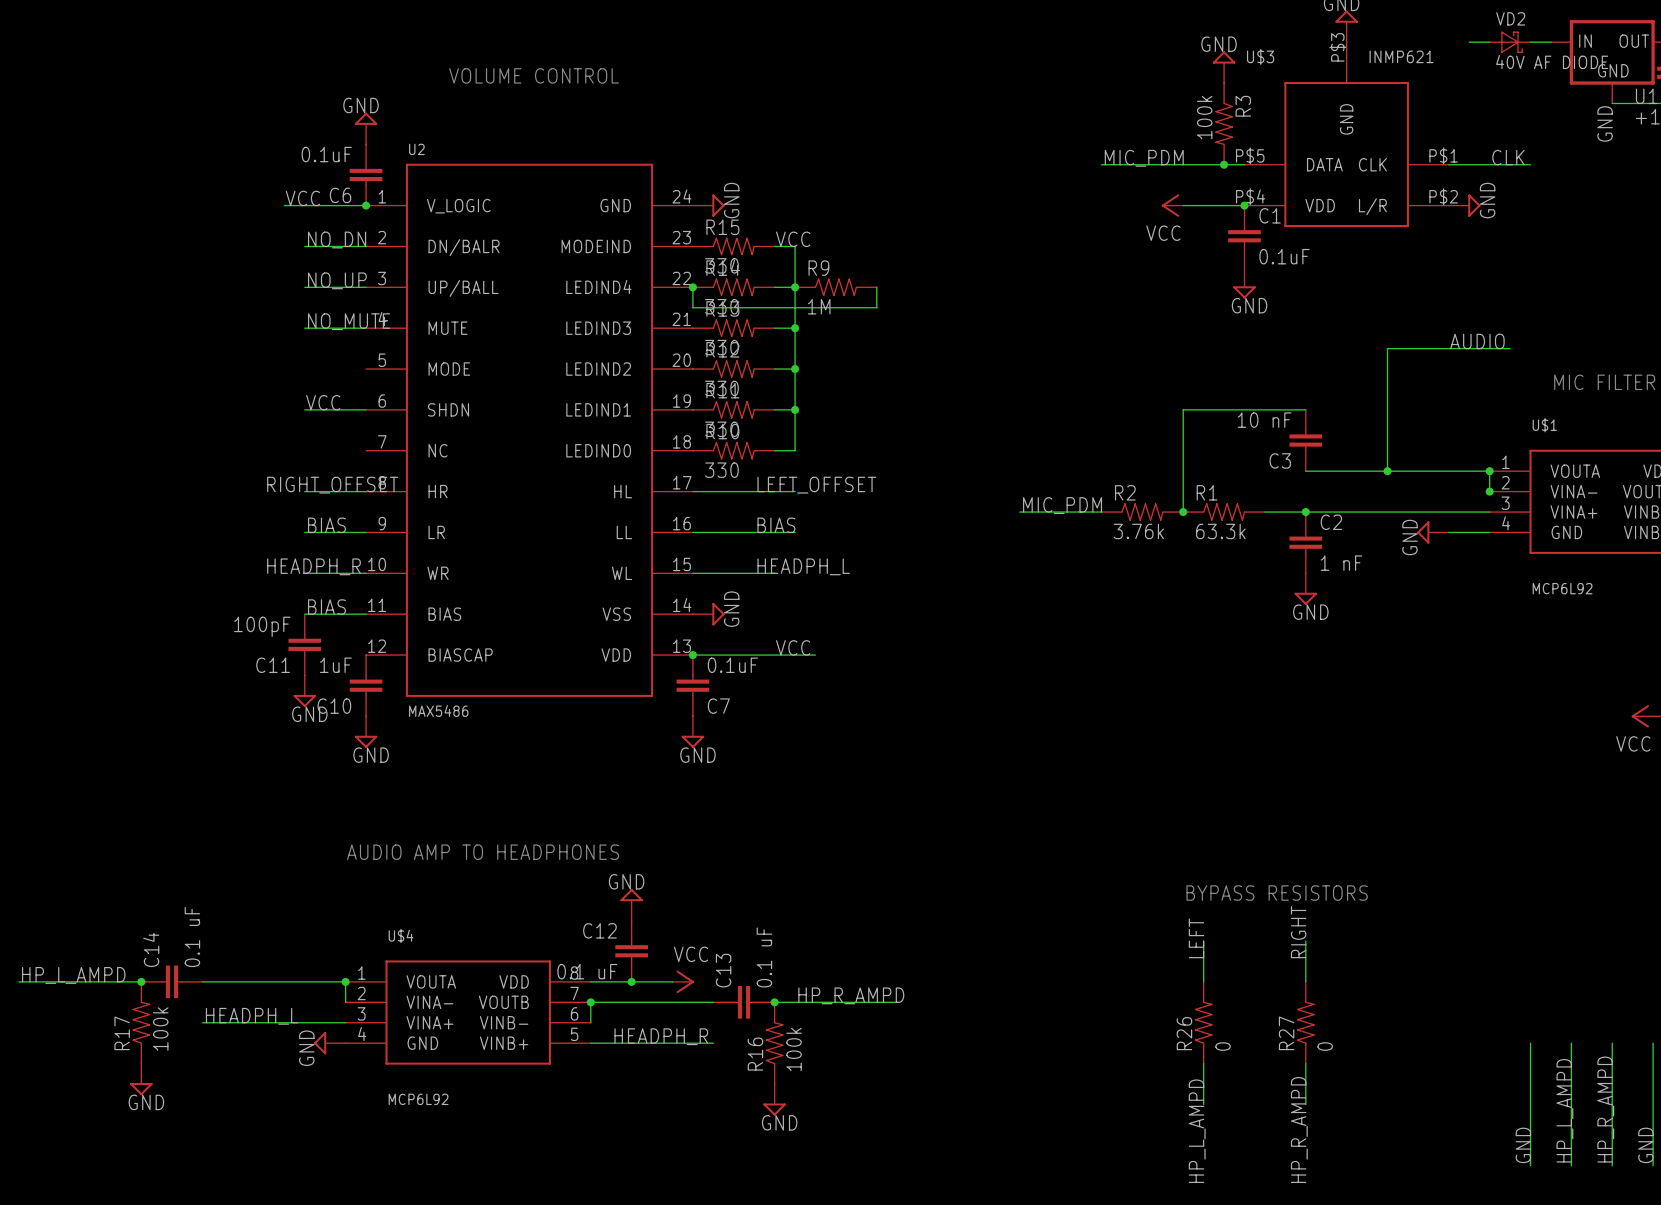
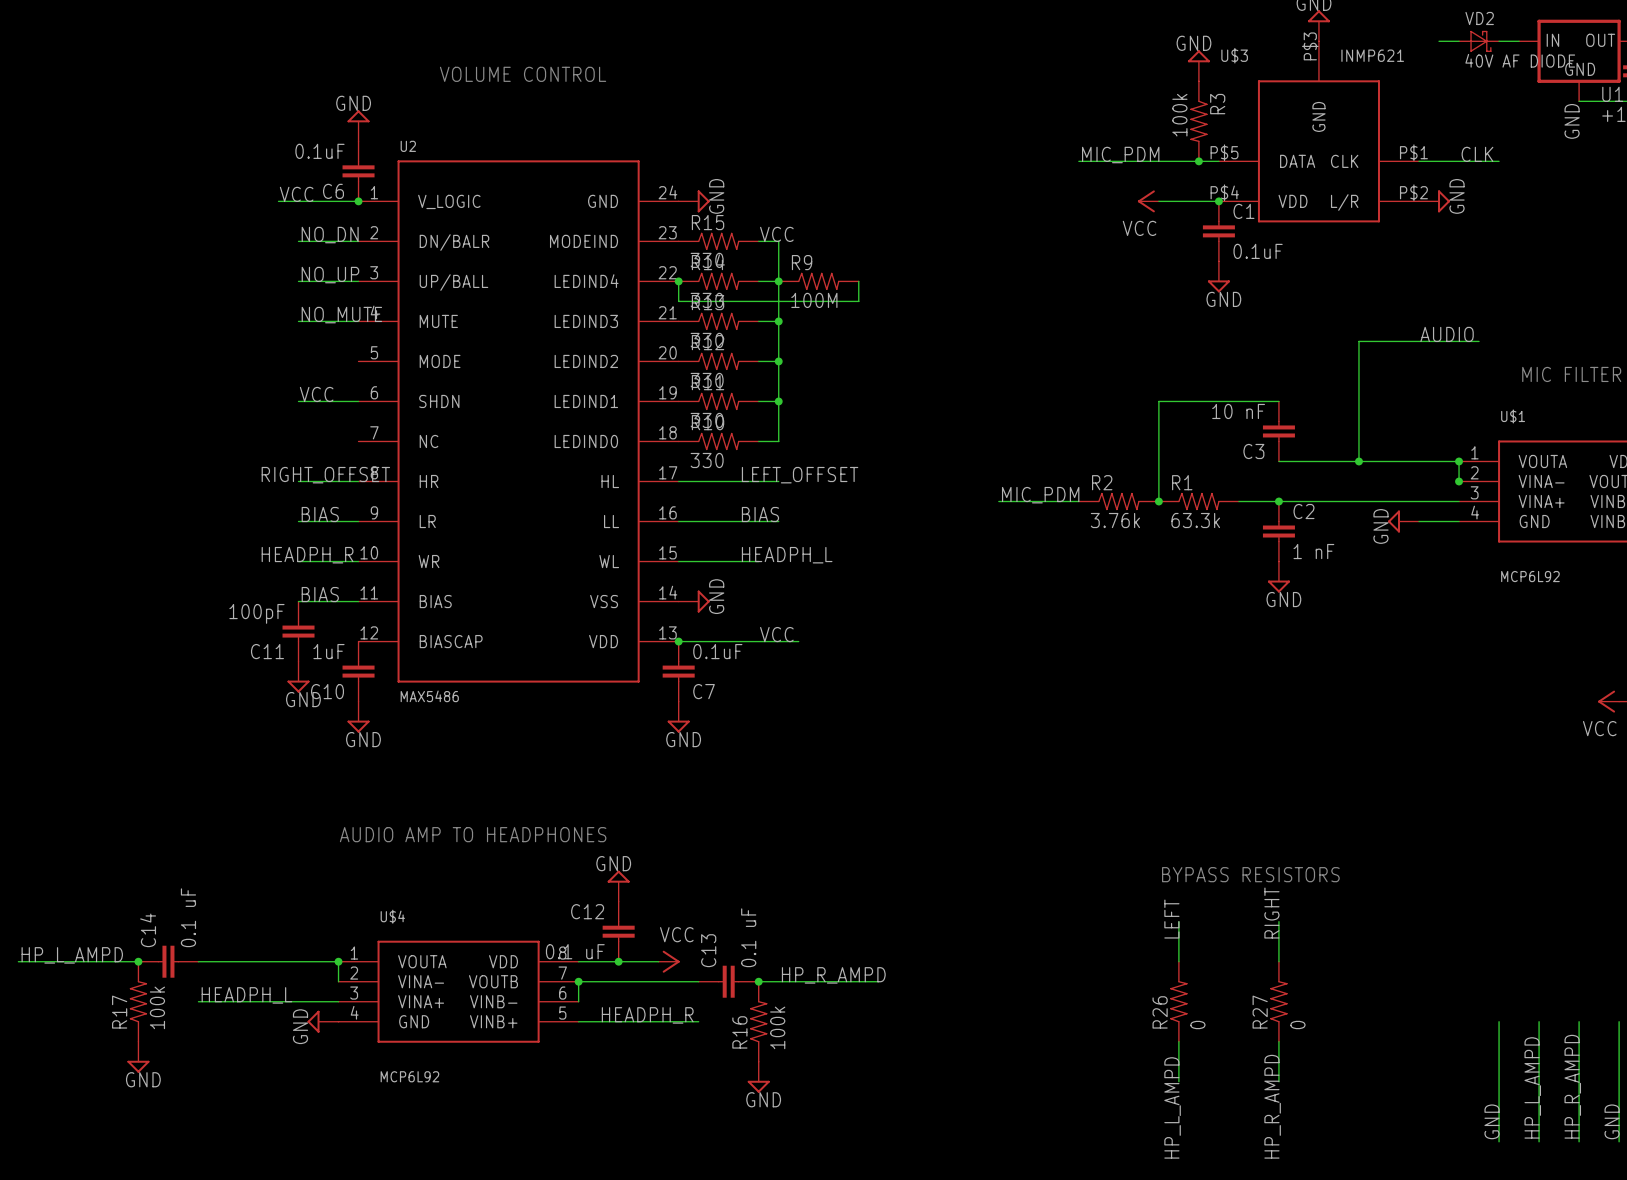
R9 value: 1M (819, 306) -> 100M (814, 300)

